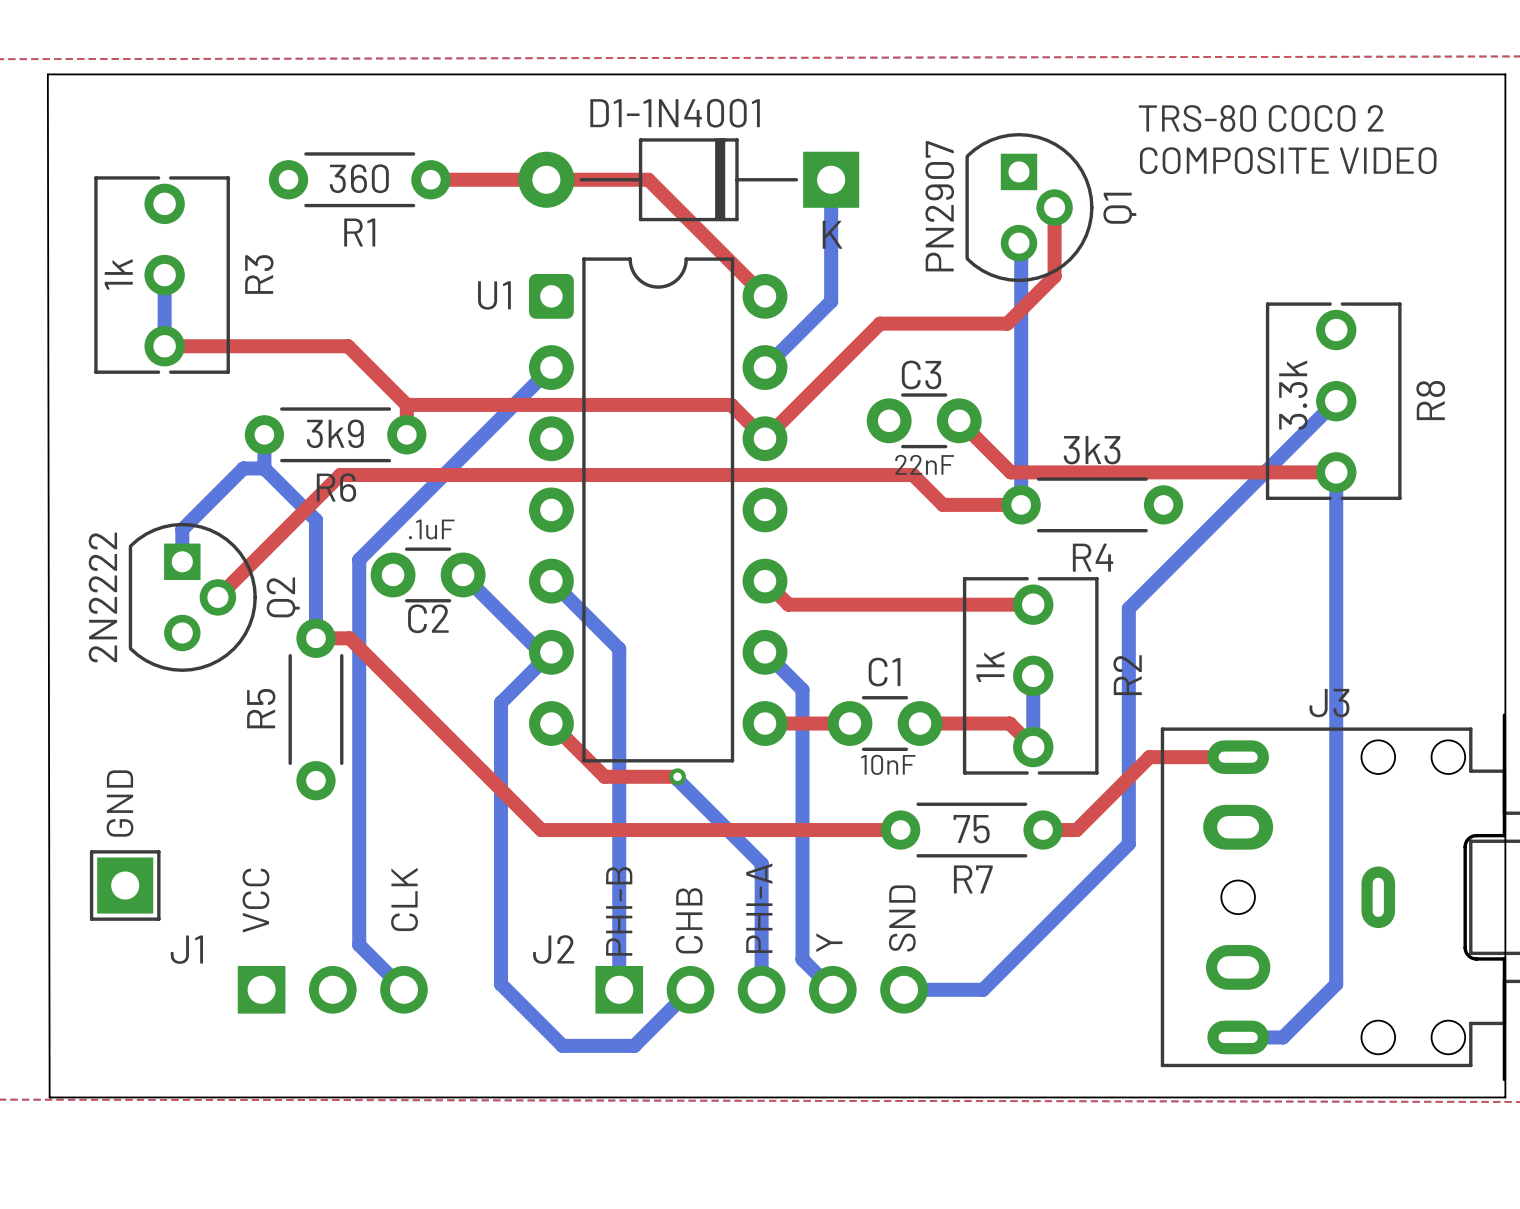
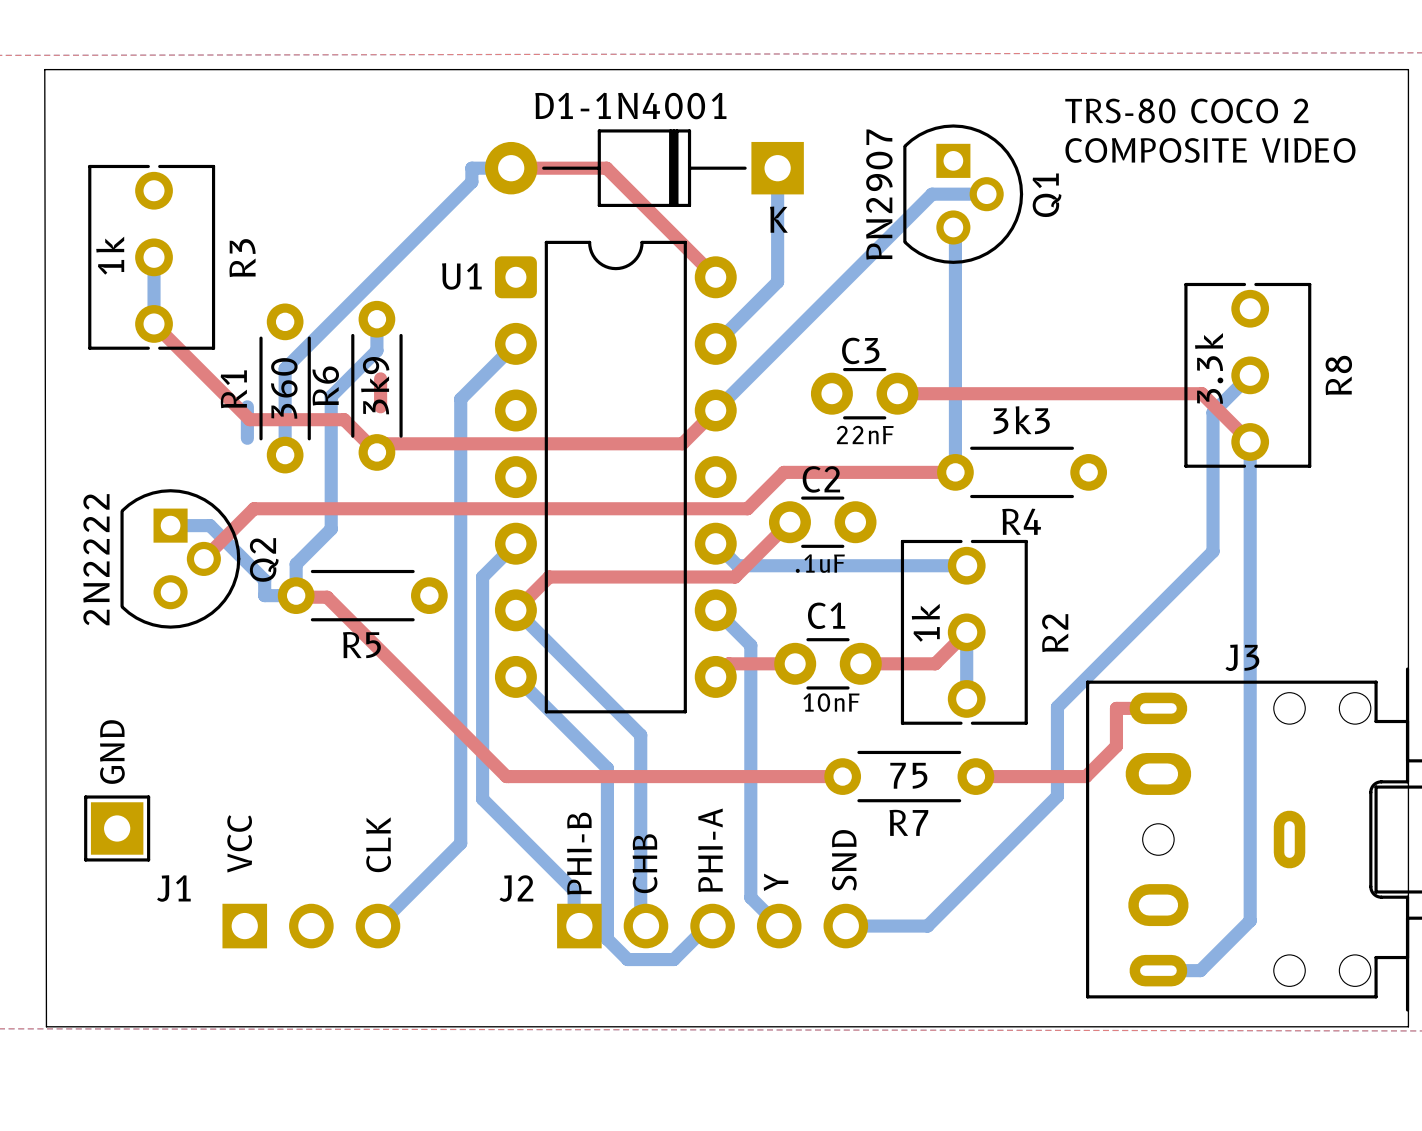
R1 rotation: 0° (359, 179) -> 90° clockwise (285, 388)
R1 position: (359, 179) -> (285, 388)
top track: (430, 179) (546, 179) -> none
bottom track: none -> (511, 168) (471, 168) (471, 182) (285, 368) (285, 455)
top track: (1054, 207) (1054, 276) (1007, 323) (880, 323) (765, 438) (731, 404) (406, 404) (348, 346) (164, 346) -> (715, 410) (682, 443) (385, 443) (376, 452) (344, 419) (249, 419) (154, 323)
bottom track: none -> (986, 194) (932, 194) (715, 410)
top track: (959, 420) (1010, 472) (1336, 472) -> (897, 393) (1201, 393) (1250, 441)
bottom track: (492, 426) (359, 559) (359, 945) (403, 989) -> (460, 399) (460, 843) (377, 926)
R6 rotation: 0° (335, 434) -> 90° clockwise (376, 385)
bottom track: (1296, 440) (1128, 608) (1128, 844) (983, 989) -> (1213, 412) (1213, 551) (1057, 707) (1057, 796) (927, 926) (919, 926)
top track: (943, 504) (913, 475) (340, 475) (271, 543) -> (882, 472) (783, 472) (747, 508) (254, 508)
C2 value position: .1uF (431, 529) -> .1uF (820, 563)
top track: none -> (789, 522) (735, 577) (549, 577) (515, 610)
bottom track: (182, 561) (182, 529) (243, 468) (264, 468) (315, 520) (315, 638) -> (170, 525) (210, 525) (264, 580) (264, 595) (296, 595) (296, 564) (331, 529) (331, 396) (376, 350) (376, 319)
C2 position: (428, 574) -> (822, 522)
bottom track: (463, 574) (540, 652) (551, 652) (500, 702) (500, 984) (562, 1045) (634, 1045) (690, 989) -> none
bottom track: (551, 581) (619, 648) (619, 989) -> (515, 543) (482, 577) (482, 799) (574, 890) (574, 926)
top track: (765, 581) (788, 604) (1033, 604) -> none
bottom track: none -> (715, 543) (737, 565) (966, 565)
C2 name position: C2 (428, 618) -> C2 (821, 479)
bottom track: none -> (515, 610) (640, 735) (640, 926)
top track: none -> (966, 632) (935, 663) (860, 663)
R5 name position: R5 (261, 708) -> R5 (361, 645)
R5 rotation: 0° (315, 709) -> 90° clockwise (362, 595)
top track: (551, 723) (604, 776) (677, 776) -> none
bottom track: none -> (515, 676) (607, 768) (607, 939) (627, 959) (673, 959) (707, 926)
top track: (765, 723) (849, 723) -> (715, 676) (728, 663) (795, 663)
C1 position: (884, 723) -> (827, 663)
top track: (920, 723) (1009, 723) (1033, 747) -> none
top track: (1193, 757) (1149, 757) (1076, 830) -> (1116, 708) (1116, 746) (1086, 776) (1007, 776)
bottom track: (677, 776) (677, 779) (761, 863) (761, 989) -> none
via: (677, 776) -> none

